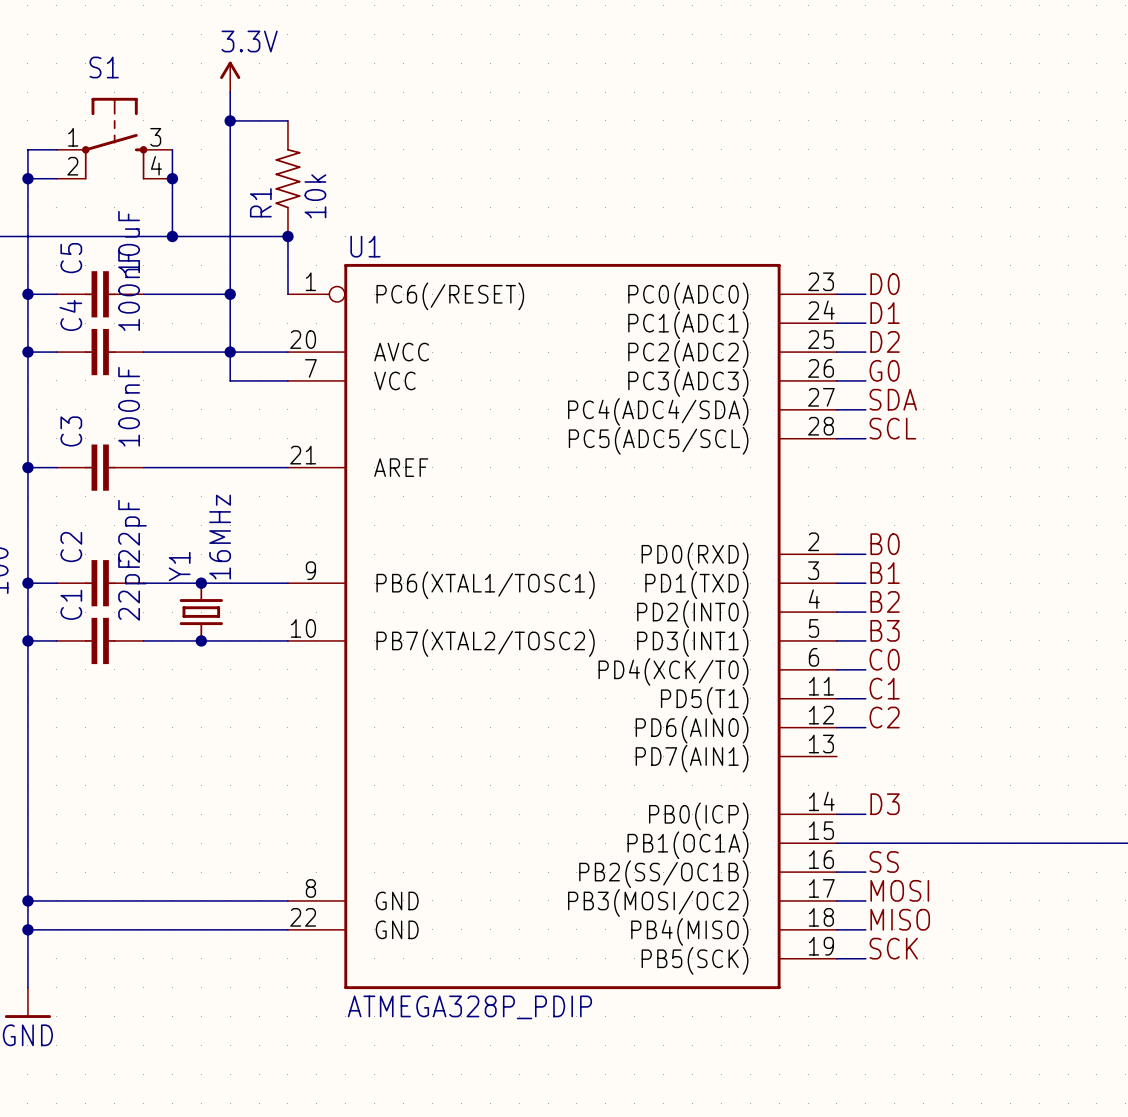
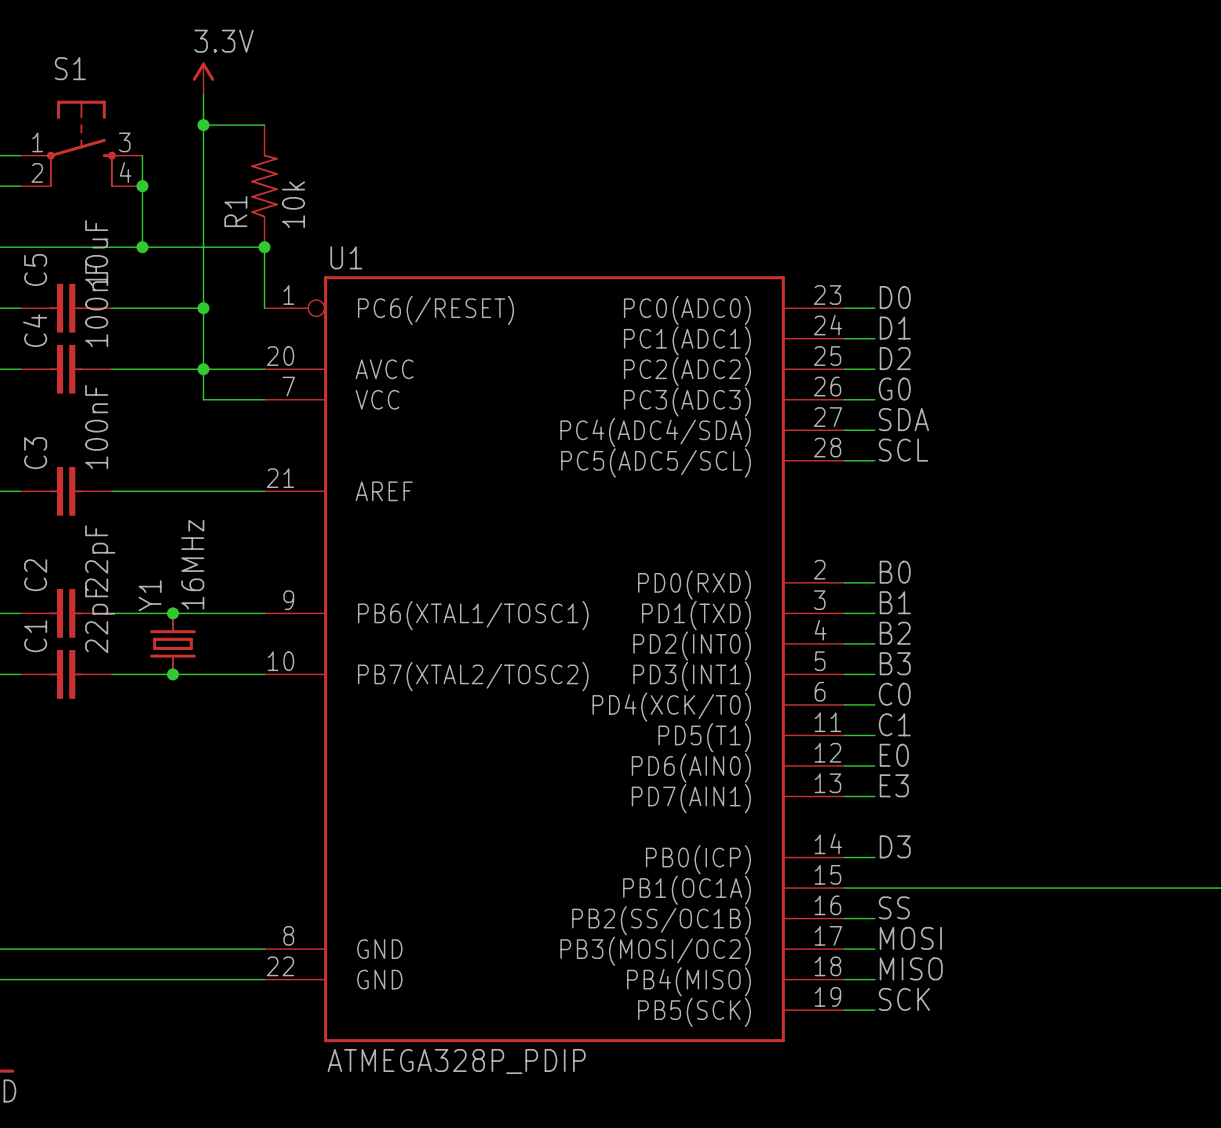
label: C2 (884, 717) -> E0 (894, 755)
label: none -> E3 (894, 785)
wire: none -> (844, 796) (874, 796)

